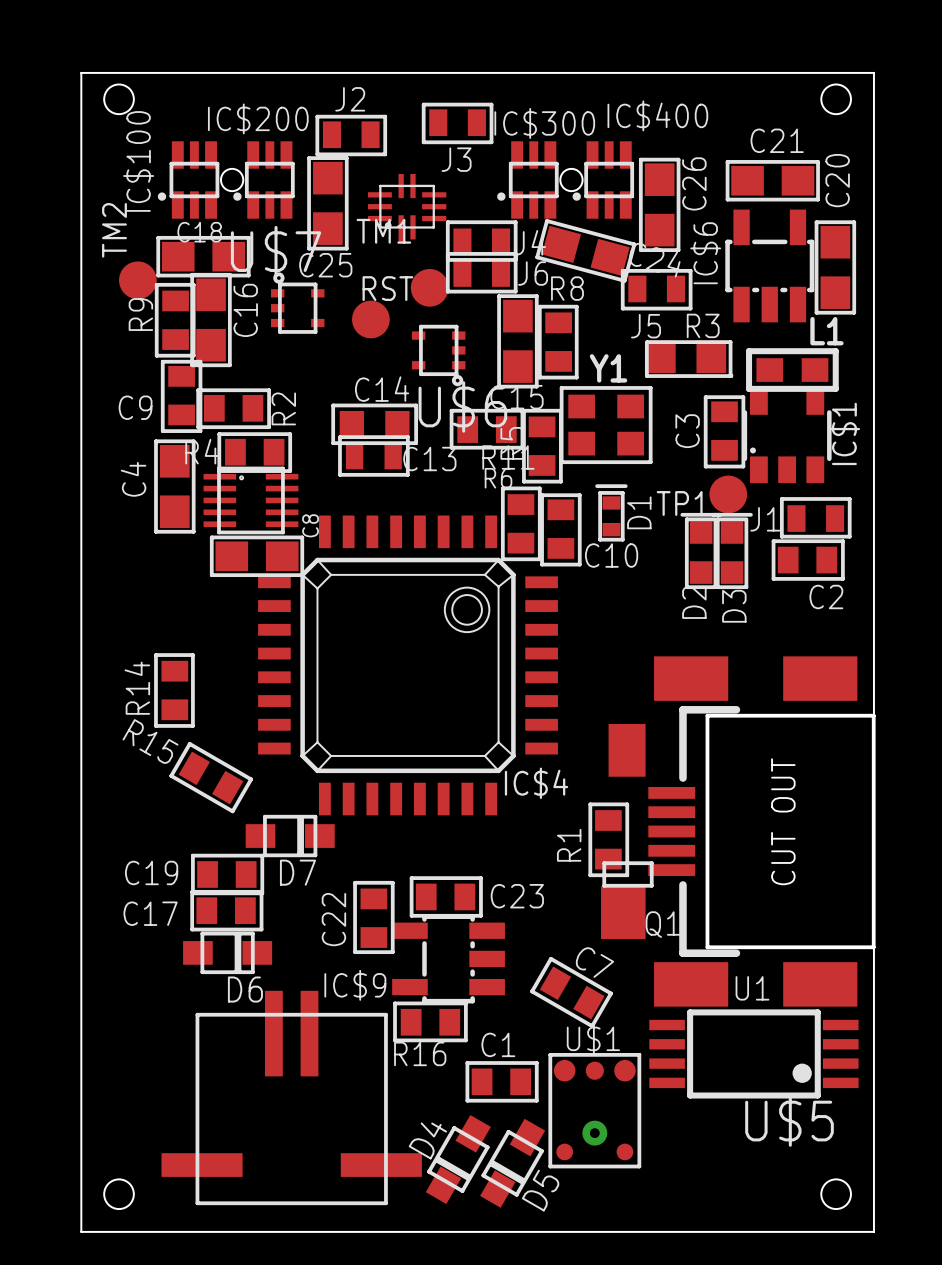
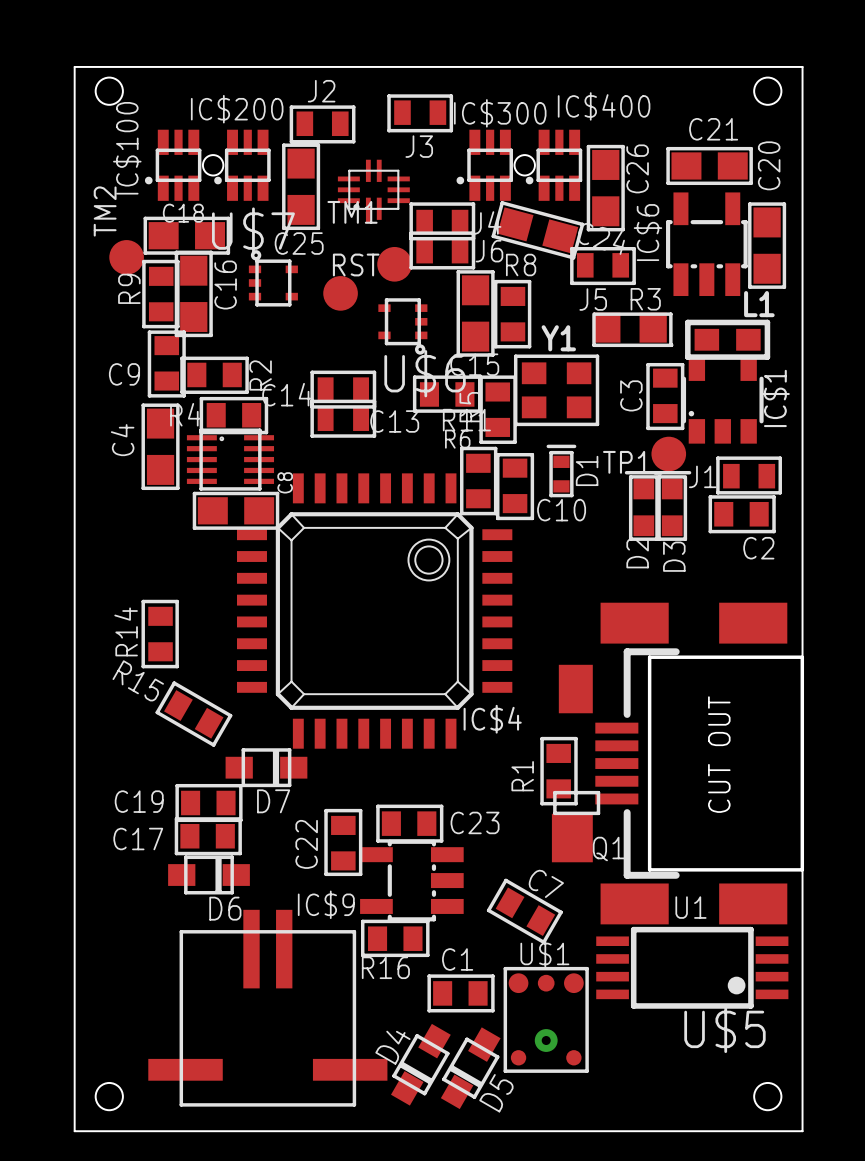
C14 name position: C14 (382, 389) -> C14 (287, 394)
C14 footprint: [331, 403, 419, 446] -> [310, 370, 377, 409]

